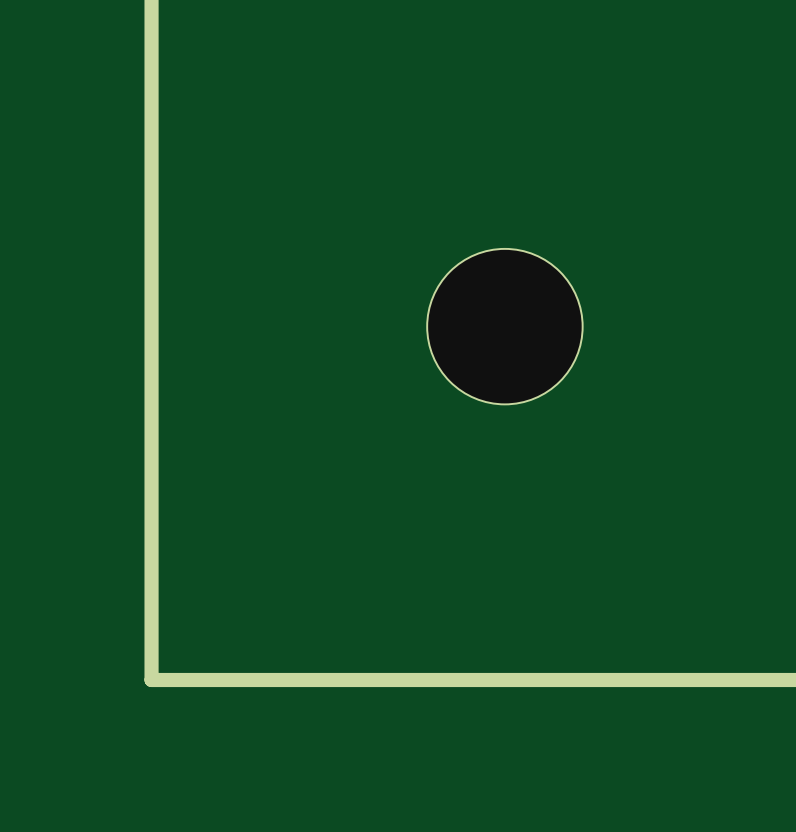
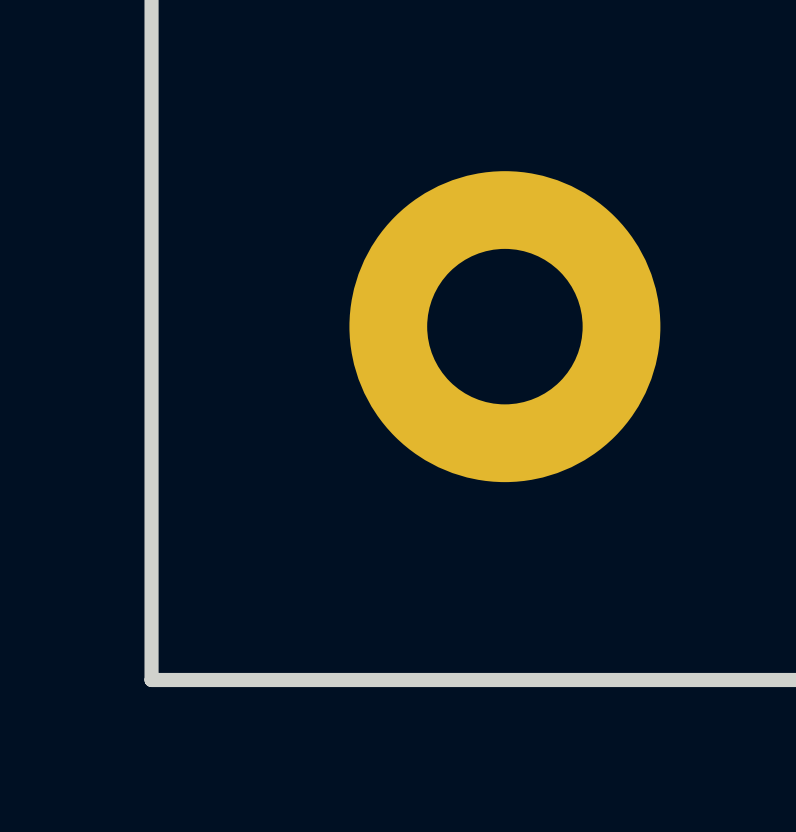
part footprint: [427, 248, 583, 405] -> [349, 171, 661, 483]

